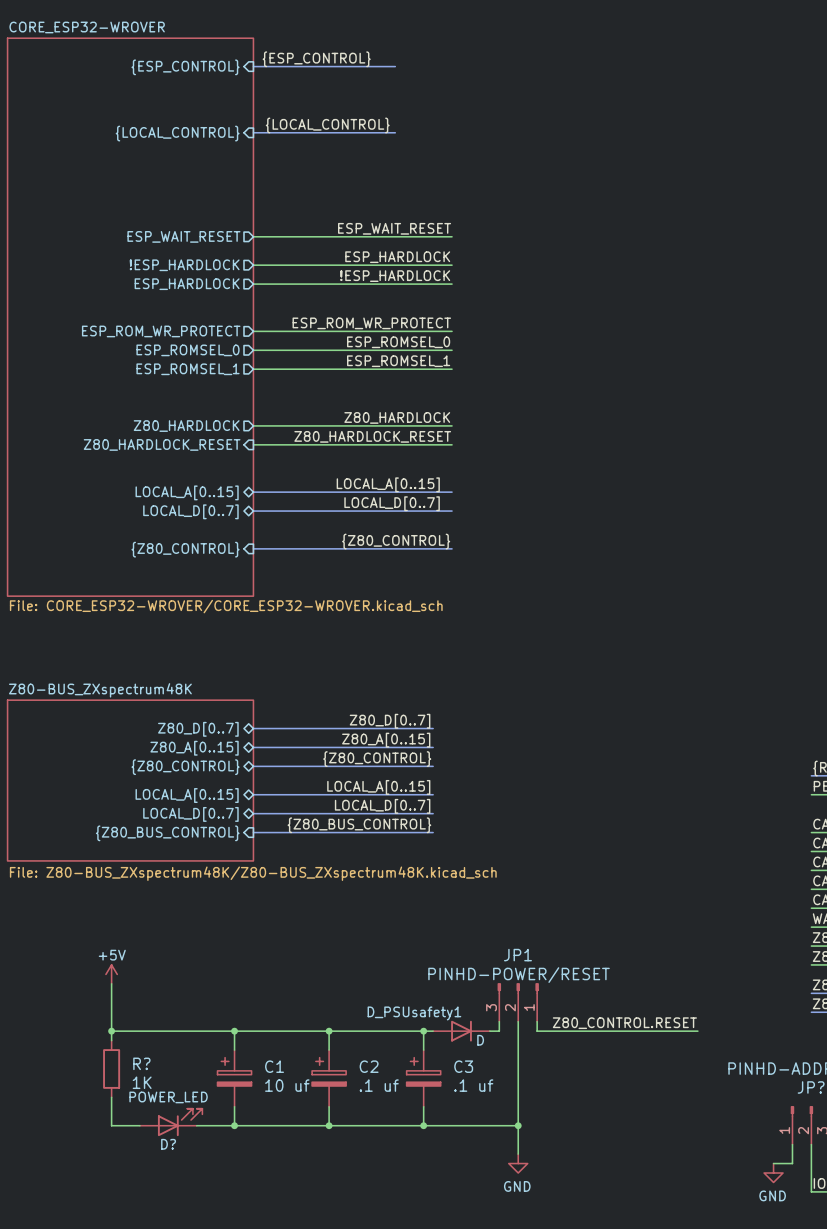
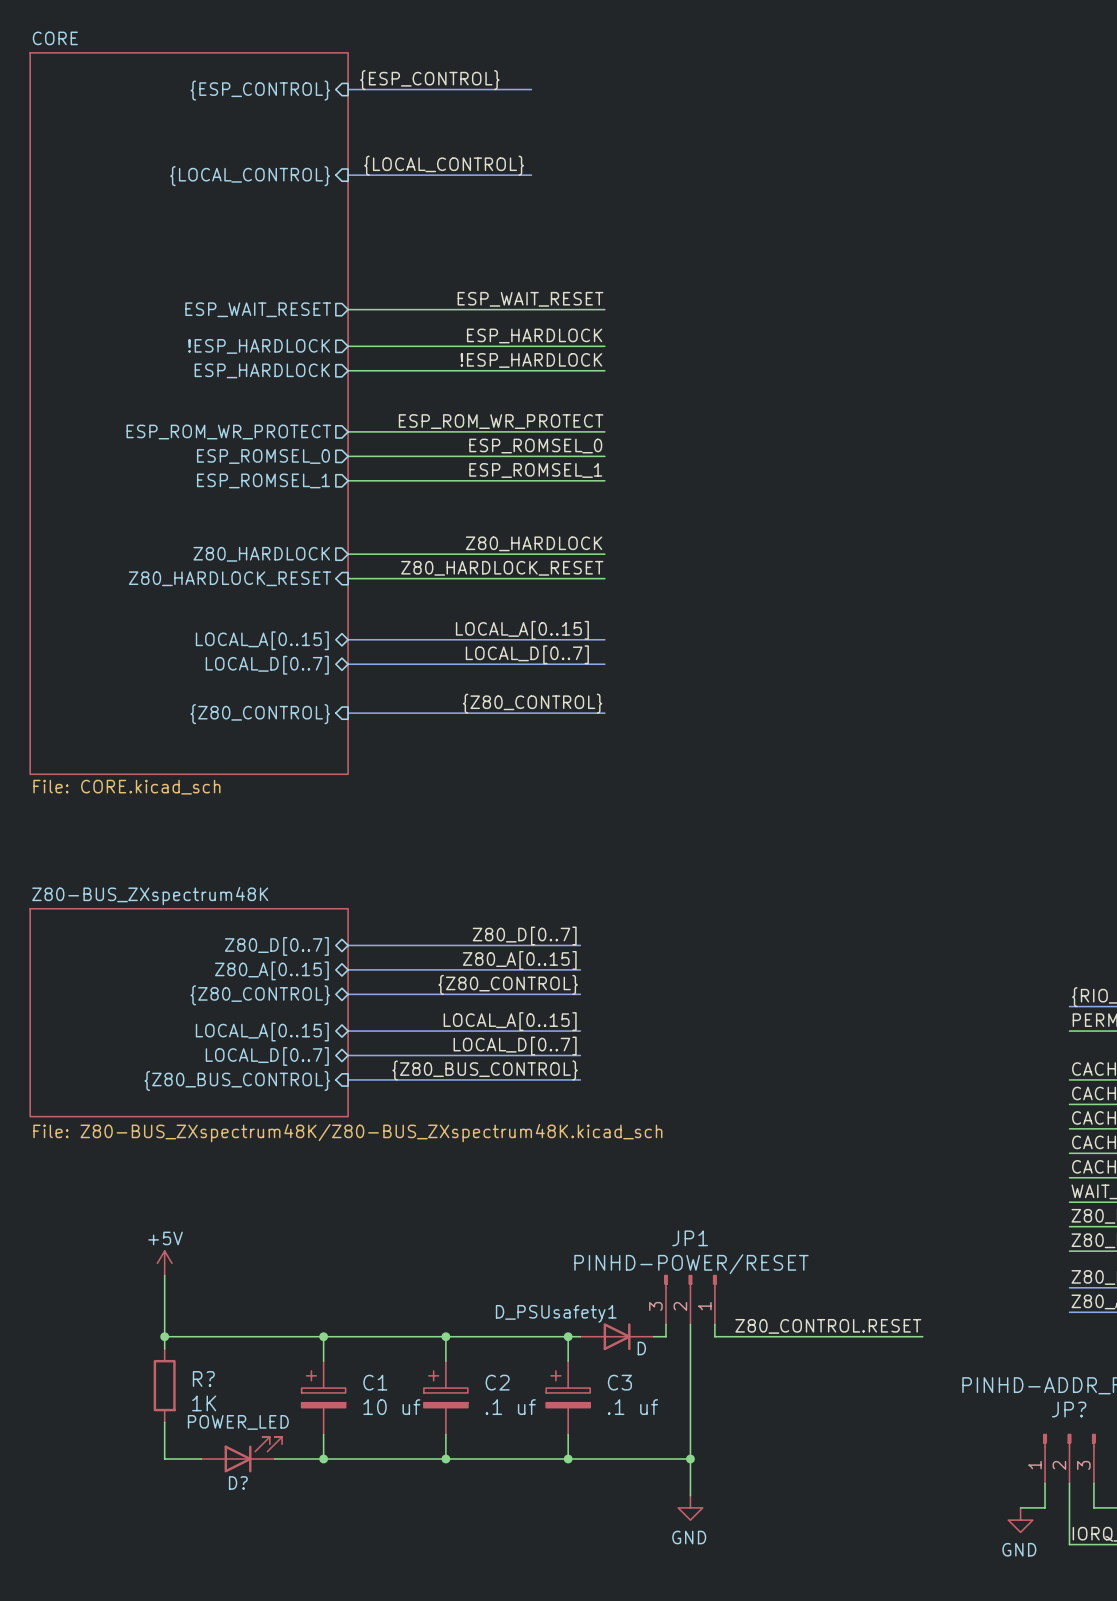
sheet CORE_ESP32-WROVER name: CORE_ESP32-WROVER (87, 27) -> CORE (55, 38)
sheet CORE_ESP32-WROVER value: File: CORE_ESP32-WROVER/CORE_ESP32-WROVER.kicad_sch (226, 606) -> File: CORE.kicad_sch (126, 787)

